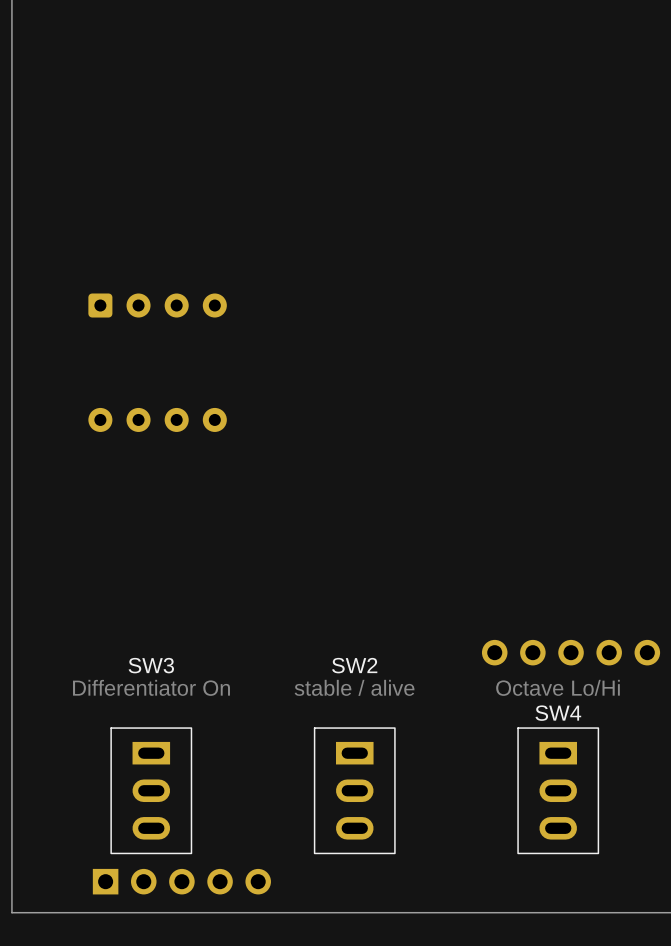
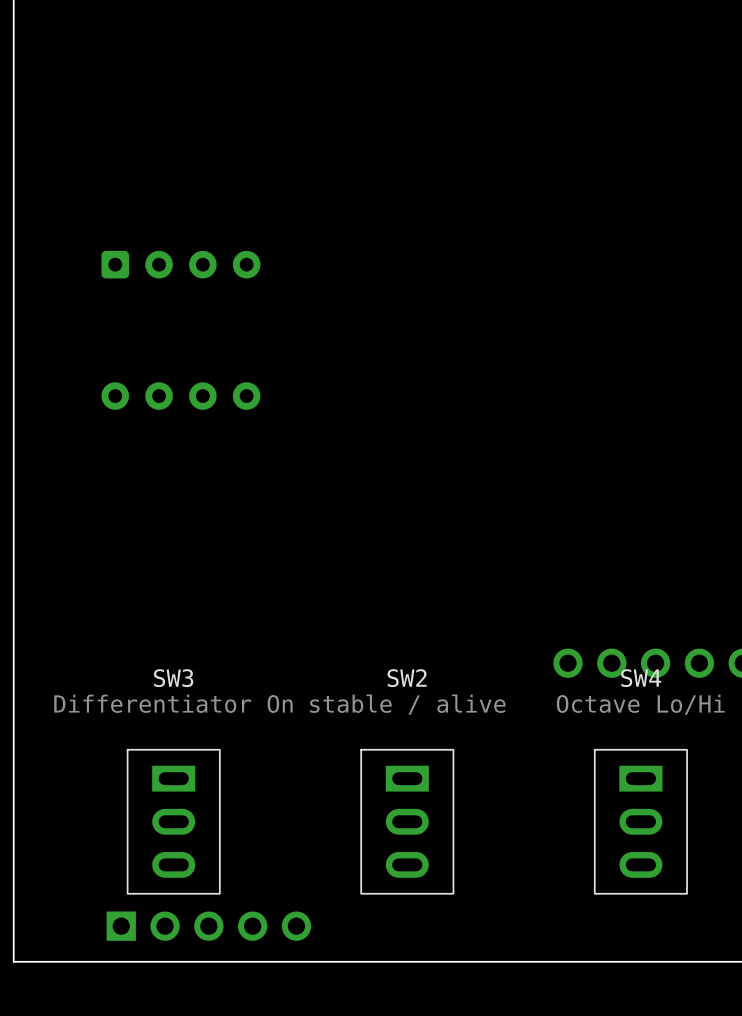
SW4 name position: SW4 (558, 713) -> SW4 (641, 678)

